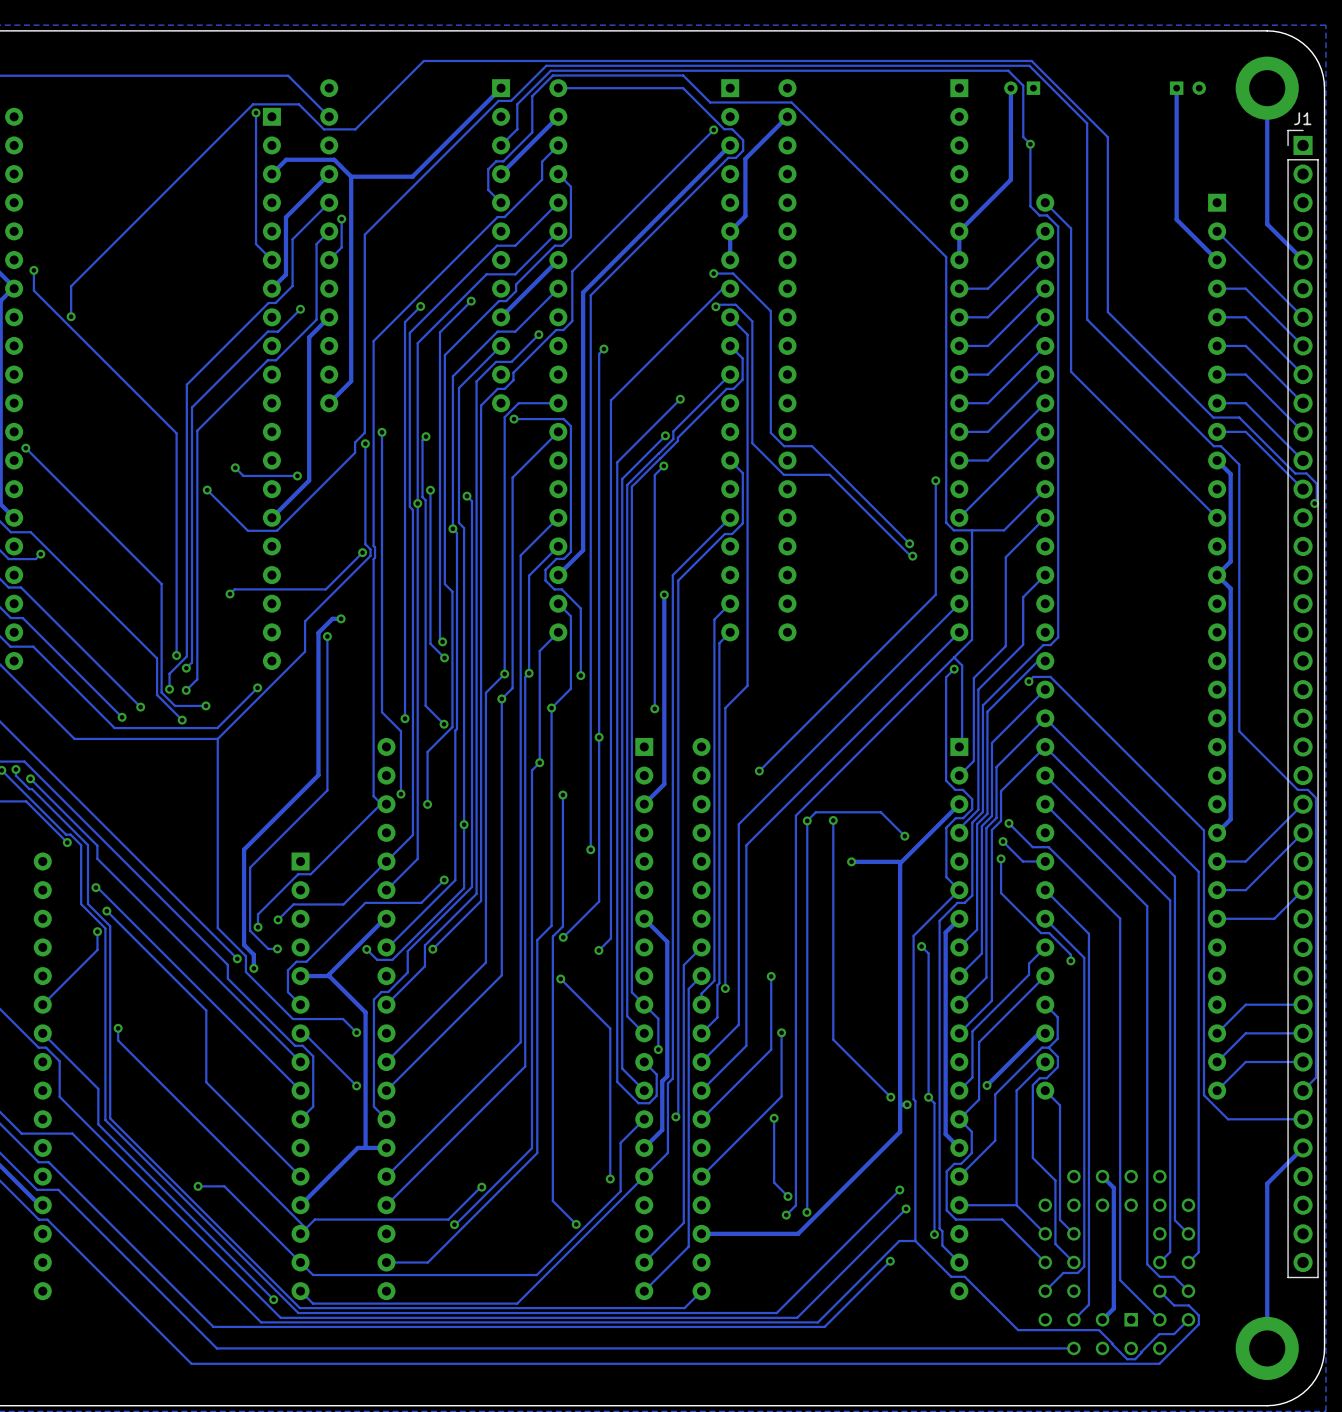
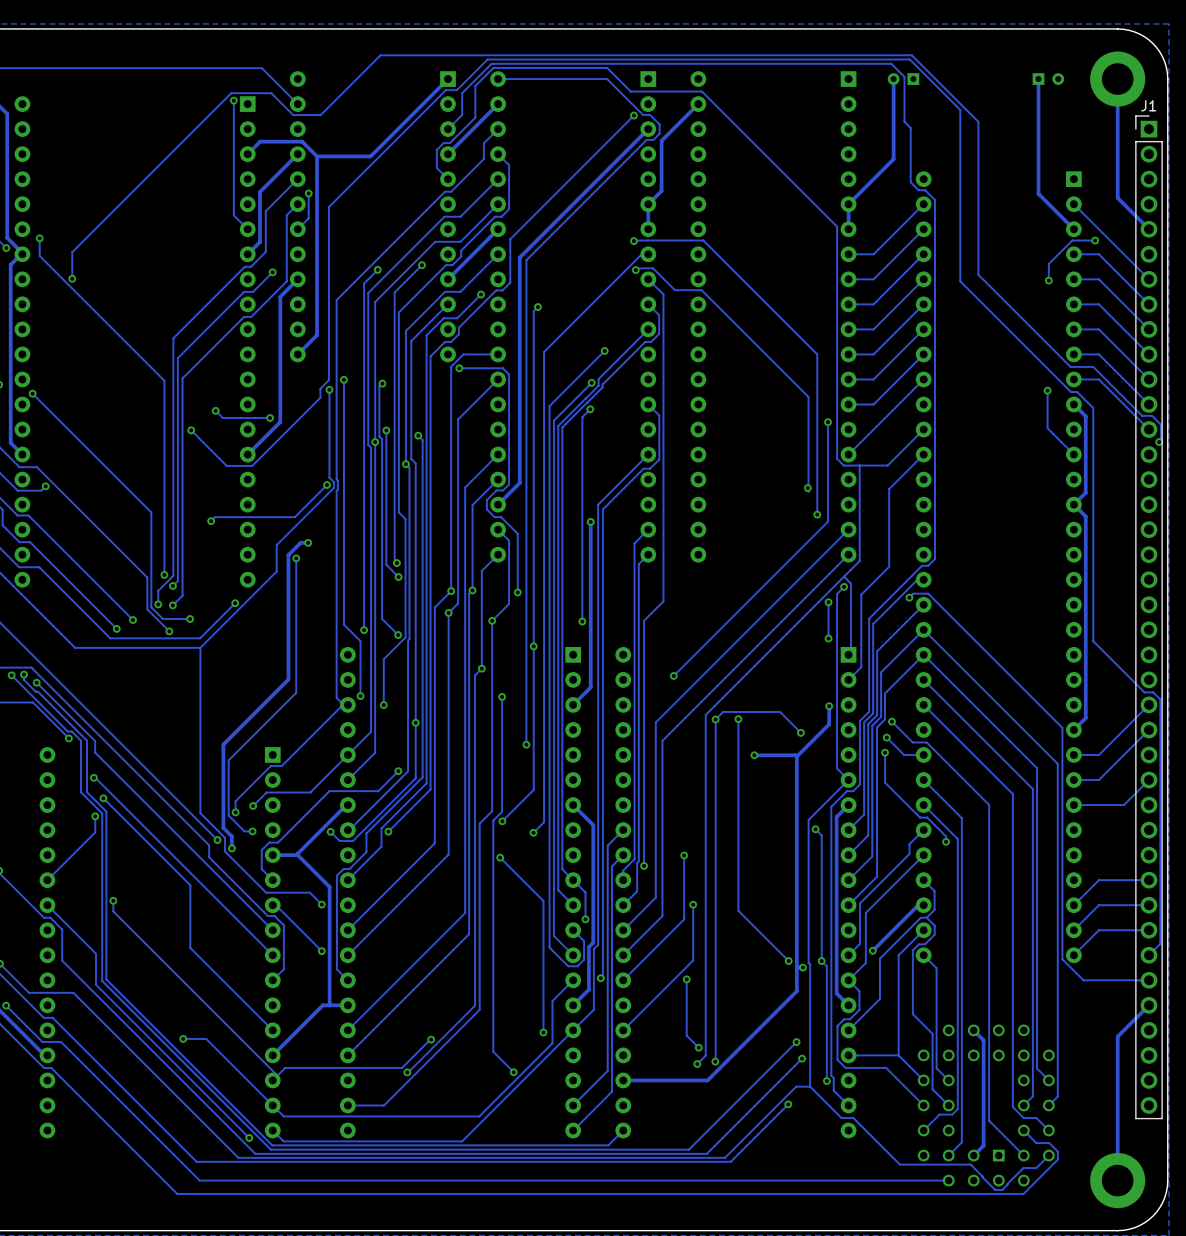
via: (1030, 144) -> none
track: (1045, 202) (1071, 228) (1071, 371) (1187, 487) -> (1047, 390) (1047, 428)
track: none -> (633, 240) (703, 240) (817, 354) (817, 514)
track: none -> (1095, 240) (1072, 240) (1048, 263) (1048, 280)
via: none -> (1095, 240)
track: (713, 273) (733, 273) (770, 311) (770, 432) (784, 446) (812, 446) (909, 543) -> none
via: none -> (1048, 280)
track: (752, 321) (752, 443) (783, 474) (829, 474) (912, 556) -> (667, 282) (674, 290) (701, 290) (808, 396) (808, 492)
via: none -> (1047, 390)
via position: (909, 543) -> (817, 514)
track: (1045, 575) (1023, 597) (1023, 644) (978, 689) (978, 809) (959, 828) (959, 832) -> none
track: none -> (828, 602) (828, 638)
via: none -> (828, 602)
via: none -> (828, 638)
track: (946, 780) (955, 789) (962, 789) (972, 799) (972, 809) (963, 818) (955, 818) (946, 827) (946, 877) -> (837, 684) (837, 768)
track: (959, 804) (937, 826) -> (829, 706) (829, 724)
via: none -> (829, 706)

